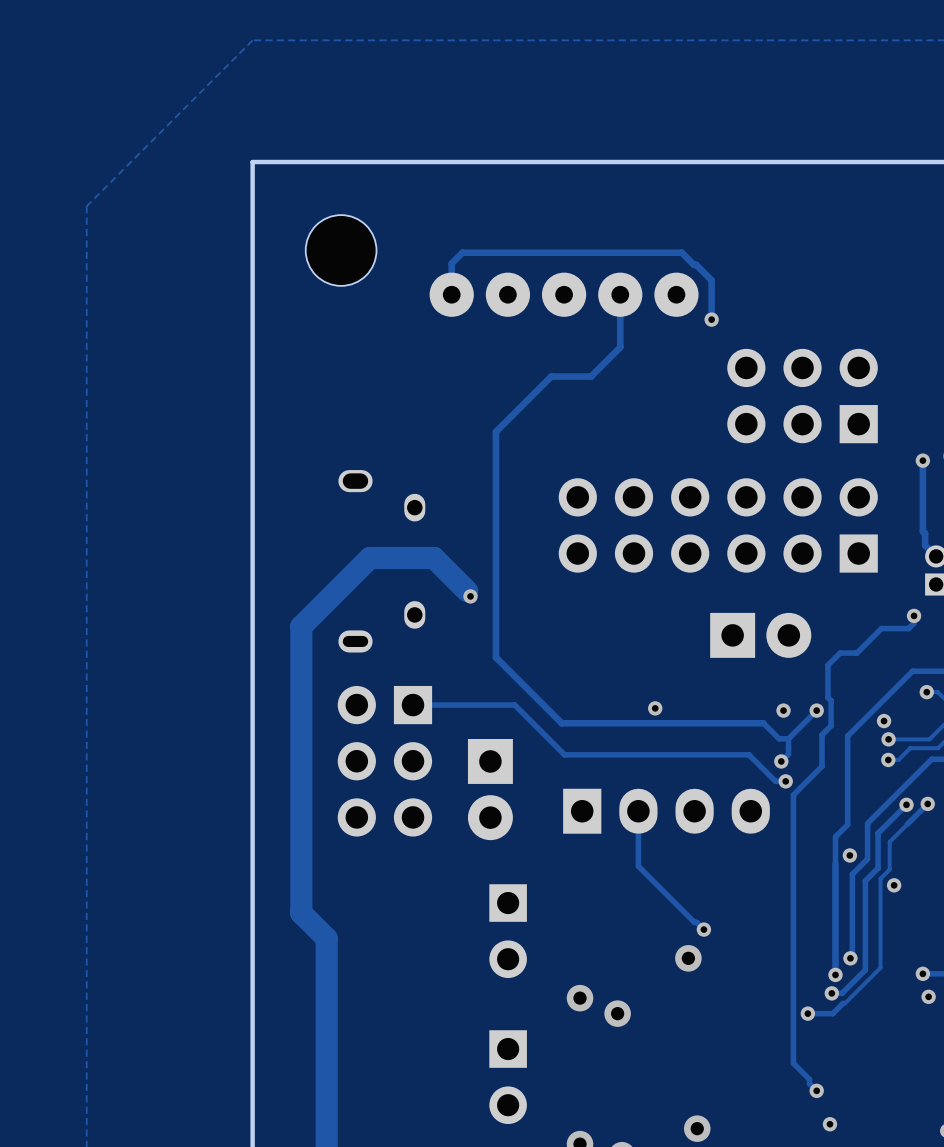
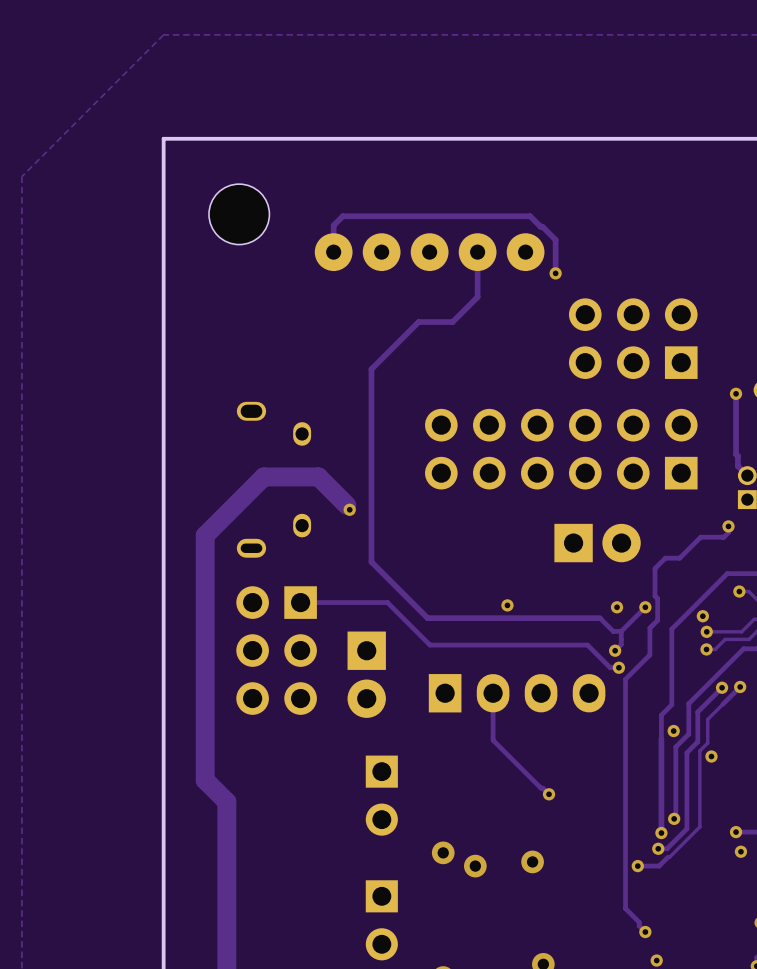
via position: (688, 958) -> (532, 861)

